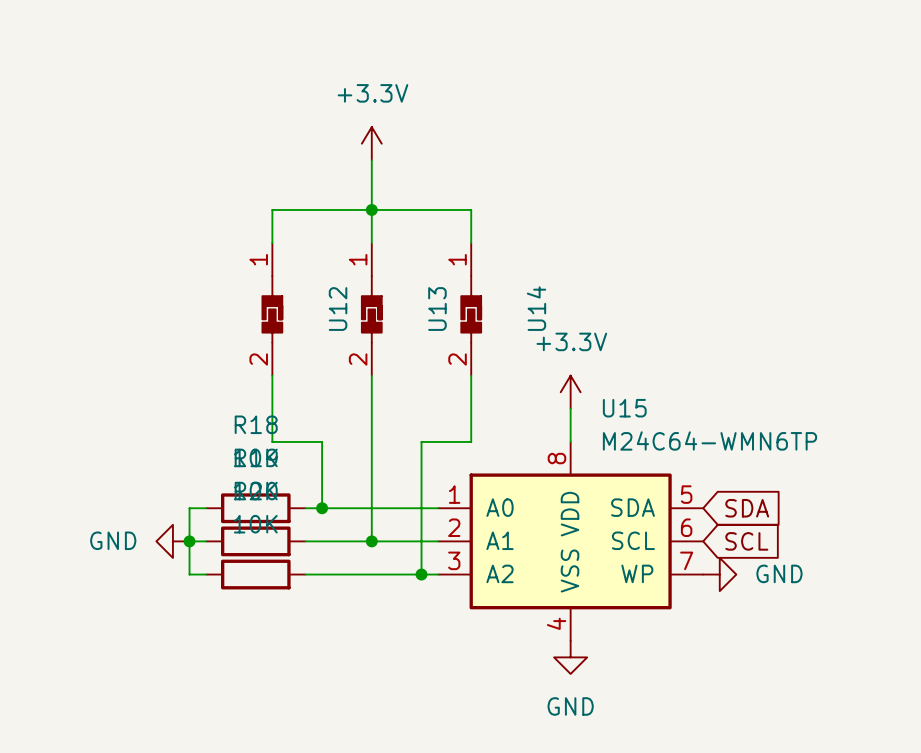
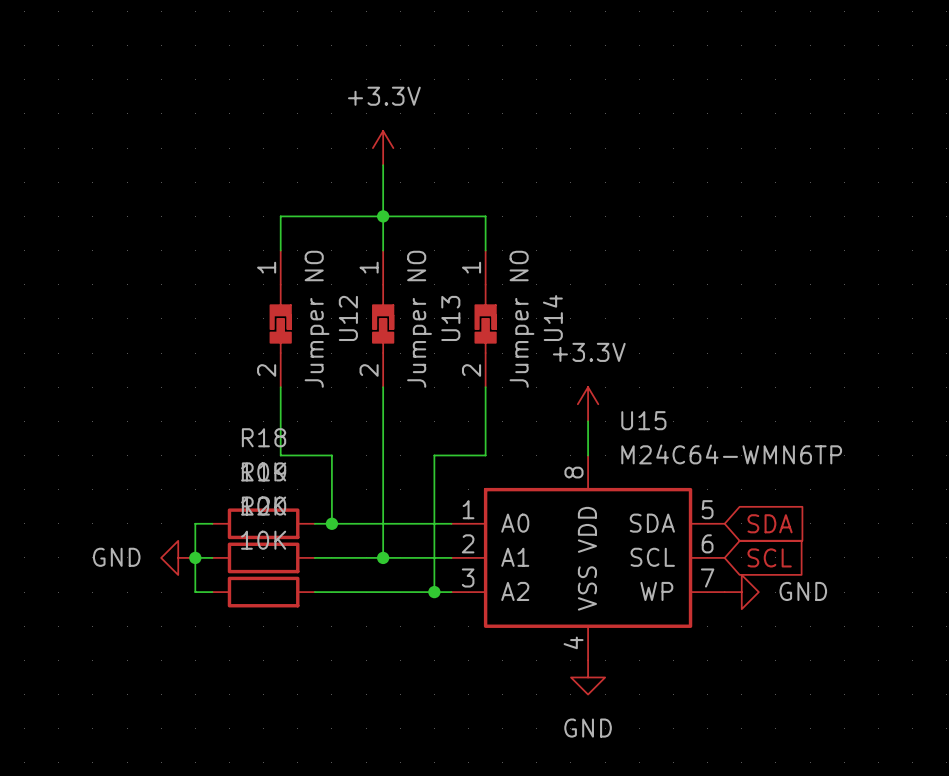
U12 value: none -> Jumper NO (317, 319)
U13 value: none -> Jumper NO (419, 319)
U14 value: none -> Jumper NO (521, 319)

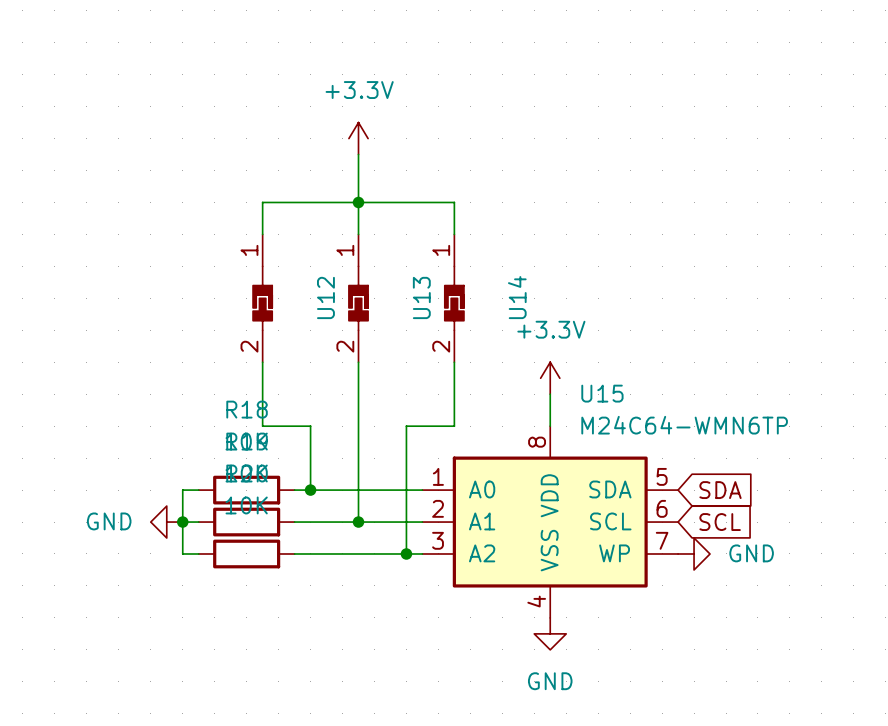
U12 value: Jumper NO (317, 319) -> none
U13 value: Jumper NO (419, 319) -> none
U14 value: Jumper NO (521, 319) -> none

